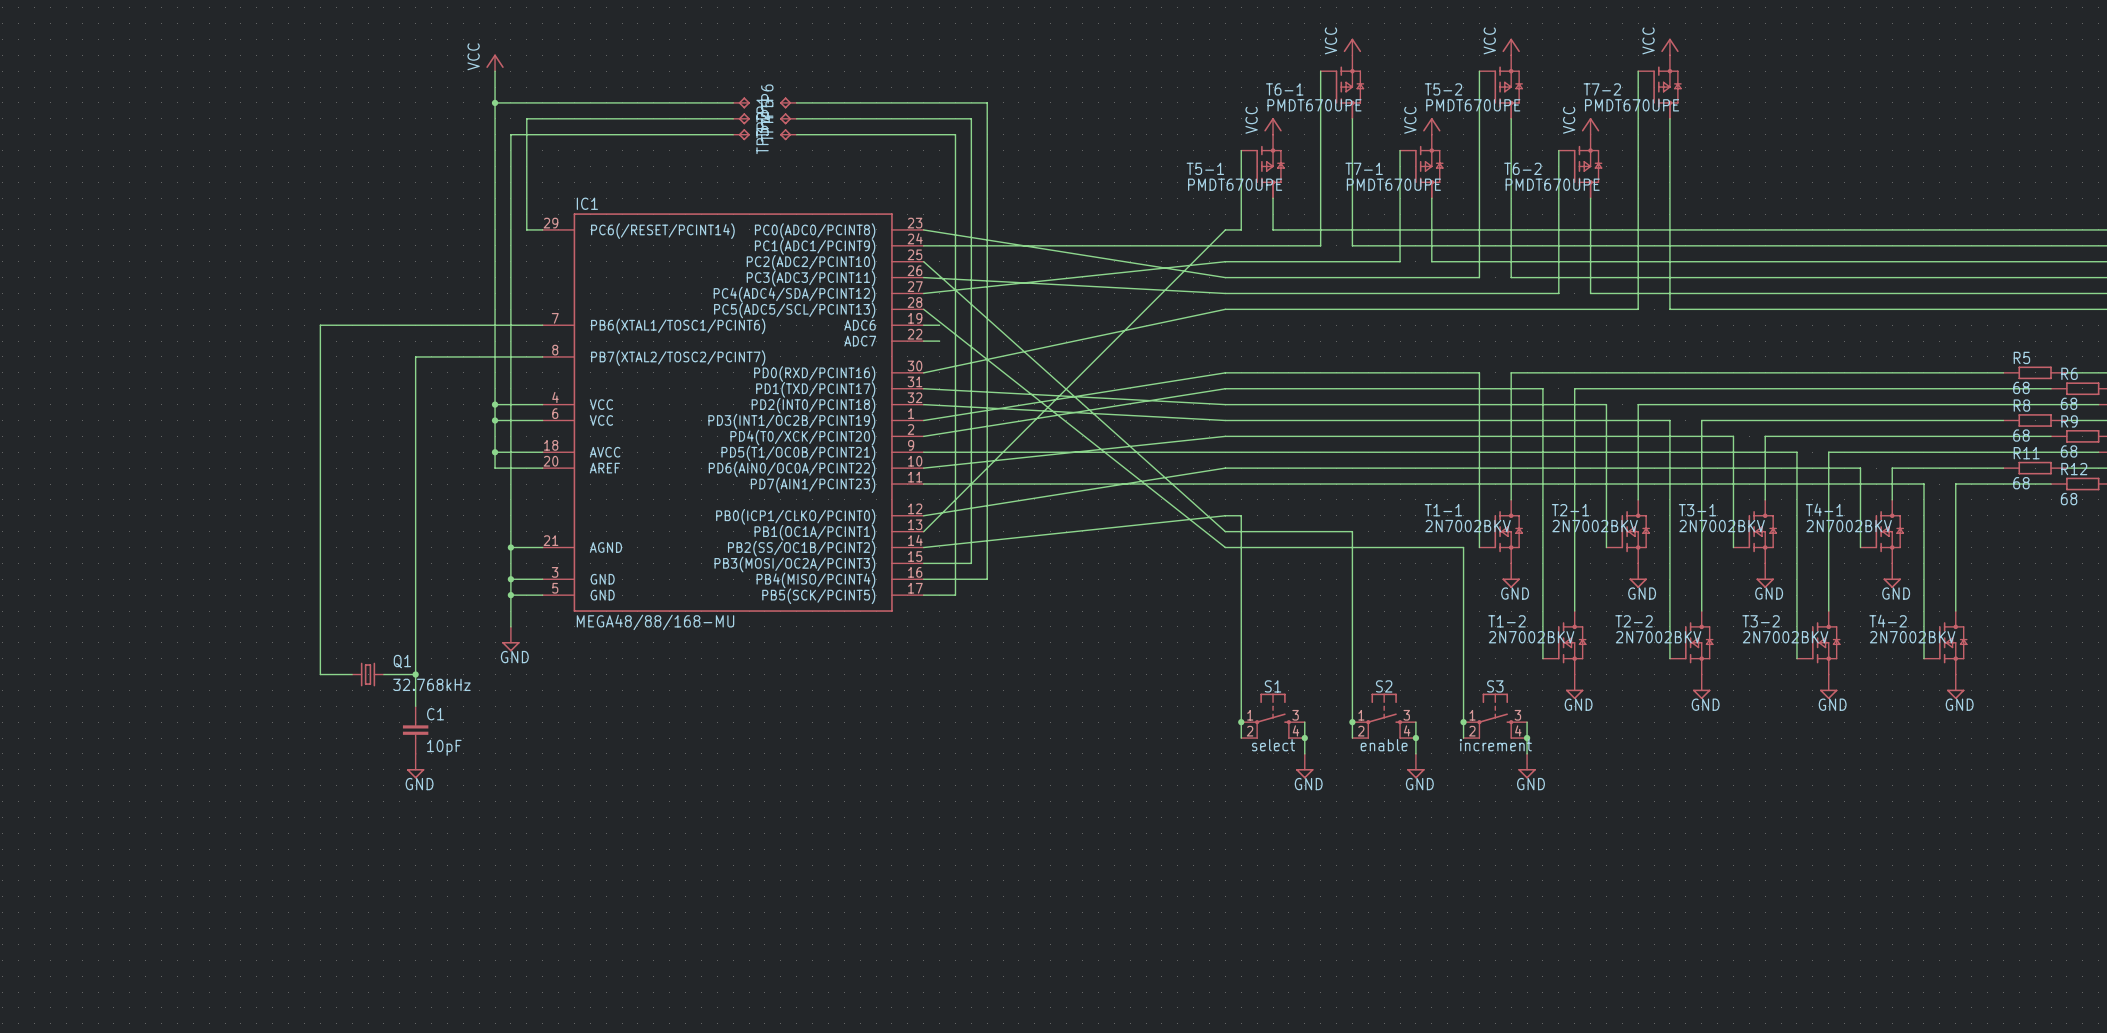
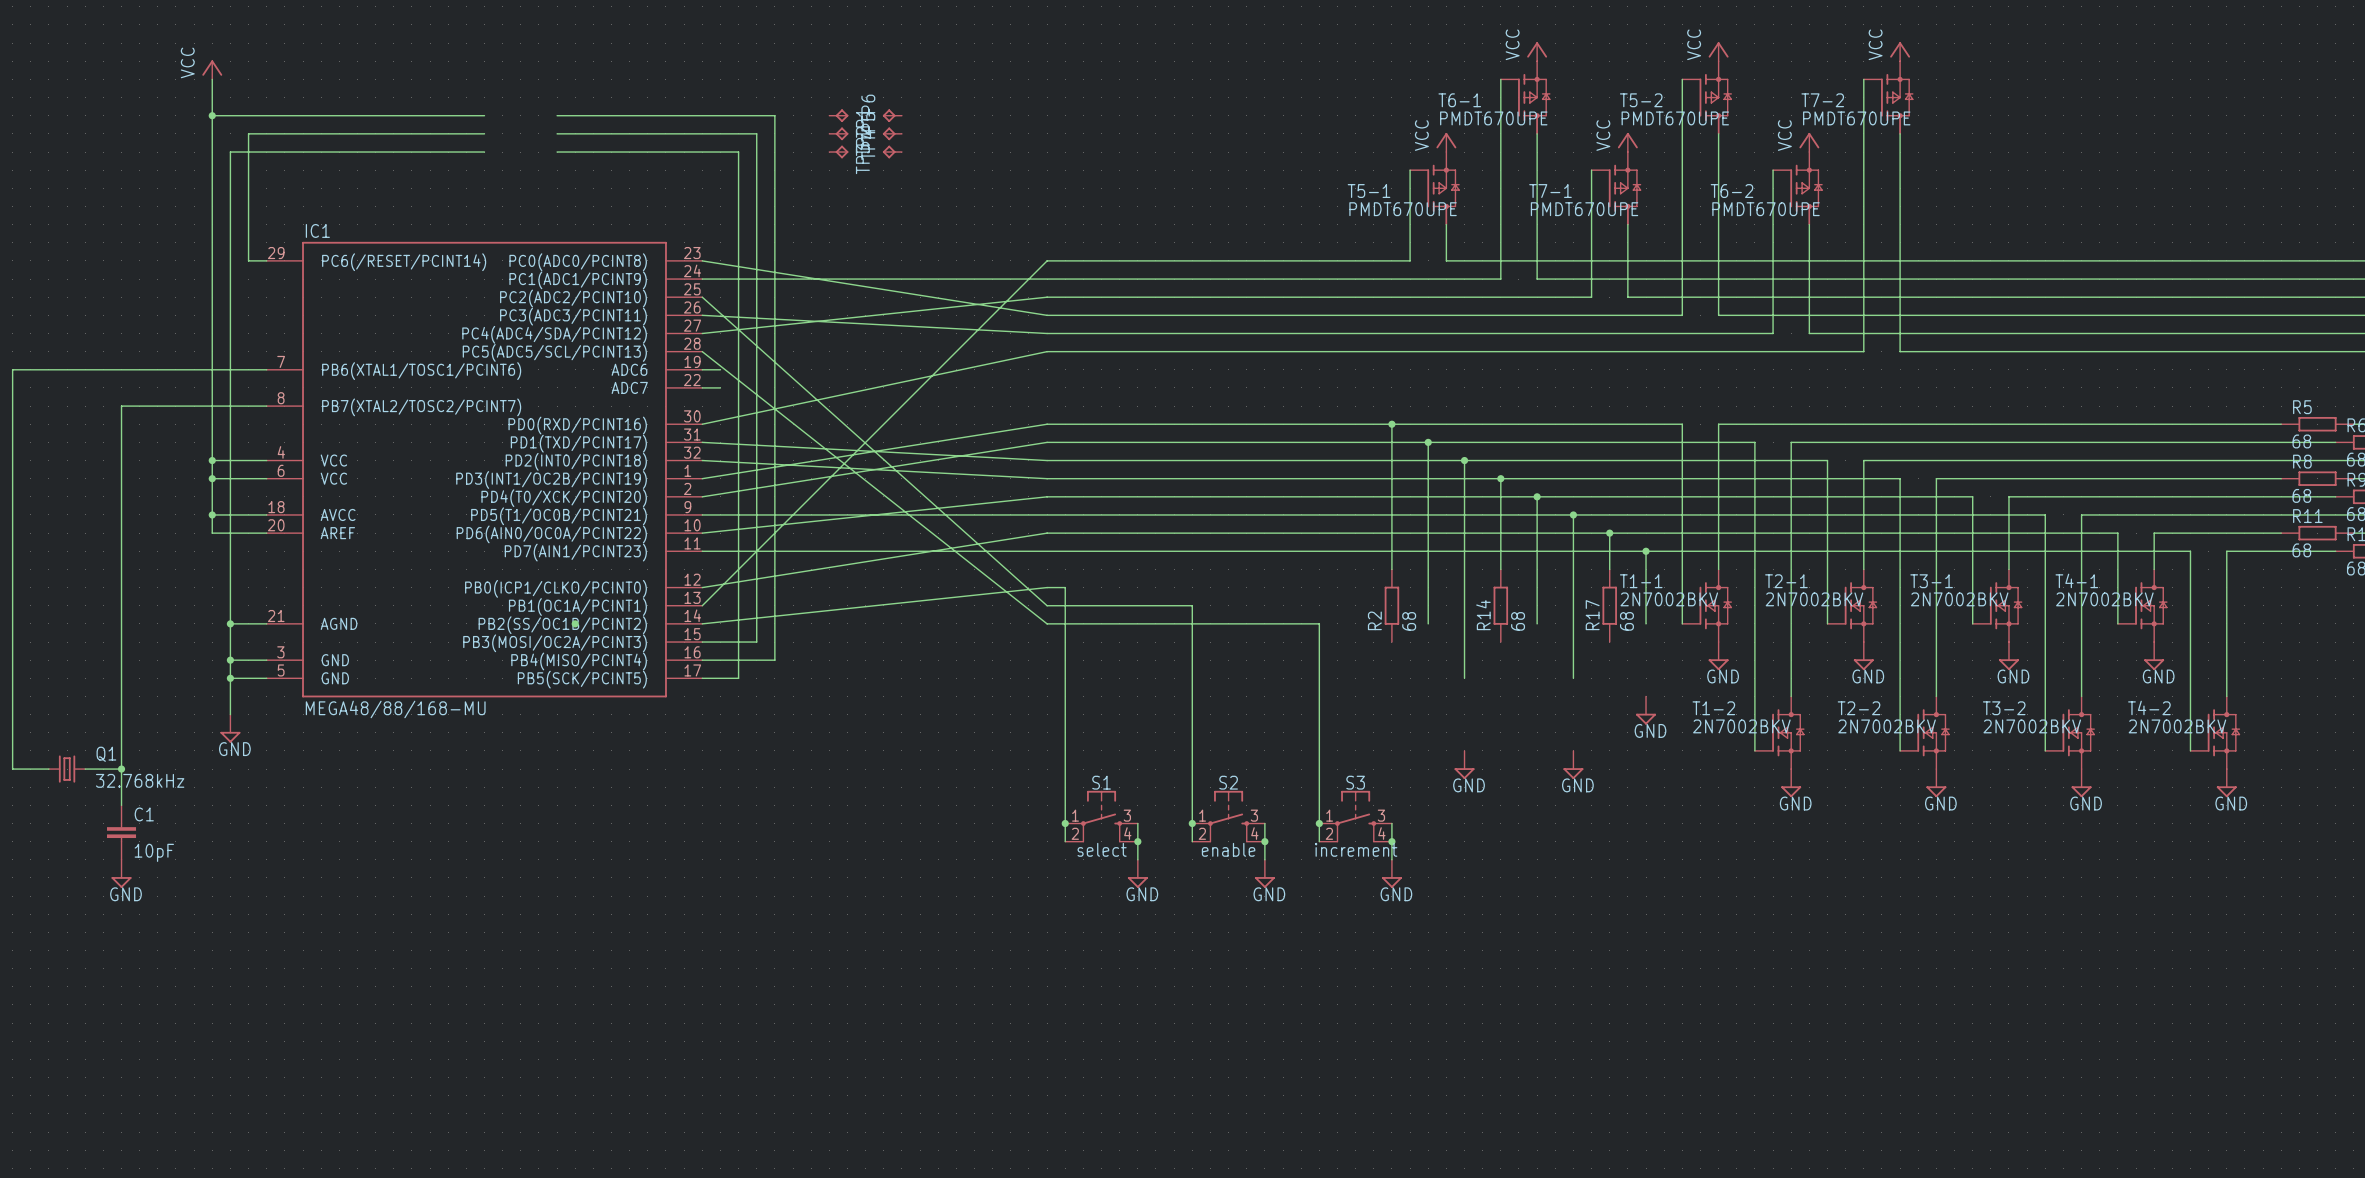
power symbol: none -> VCC (212, 69)
power symbol: VCC (495, 62) -> none
wire: none -> (212, 79) (212, 533) (266, 533)
wire: (495, 71) (495, 468) (542, 468) -> none
wire: none -> (212, 115) (484, 115)
junction: none -> (212, 115)
junction: (495, 102) -> none
wire: (685, 102) (733, 102) -> (774, 115) (774, 660) (702, 660)
wire: (796, 102) (987, 102) (987, 579) (923, 579) -> none
wire: none -> (484, 133) (248, 133) (248, 260) (266, 260)
wire: (526, 118) (526, 229) (542, 229) -> (593, 133) (557, 133)
wire: (669, 118) (733, 118) -> (756, 133) (756, 642) (702, 642)
wire: (796, 118) (971, 118) (971, 563) (923, 563) -> none
wire: none -> (484, 152) (230, 152) (230, 714)
wire: (510, 134) (510, 626) -> (575, 152) (557, 152)
wire: (653, 134) (733, 134) -> (738, 152) (738, 678) (702, 678)
wire: (796, 134) (955, 134) (955, 595) (923, 595) -> none
wire: (923, 229) (1225, 277) -> (702, 260) (1047, 315) (1391, 315)
wire: (1225, 229) (923, 531) -> (1391, 260) (1047, 260) (702, 605)
wire: none -> (702, 279) (1047, 279)
wire: none -> (702, 297) (1047, 605) (1192, 605) (1192, 841)
wire: (923, 261) (1225, 531) (1352, 531) -> (1537, 496) (1537, 605)
wire: (1225, 261) (923, 293) -> (1391, 297) (1047, 297) (702, 333)
wire: (923, 277) (1225, 293) -> (702, 315) (1047, 333) (1391, 333)
wire: none -> (702, 351) (1047, 623) (1319, 623) (1319, 841)
wire: (923, 309) (1225, 547) (1463, 547) (1463, 738) -> none
wire: (1225, 309) (923, 372) -> (1391, 351) (1047, 351) (702, 424)
wire: none -> (266, 369) (12, 369) (12, 769) (48, 769)
wire: (542, 325) (320, 325) (320, 674) (352, 674) -> none
wire: none -> (702, 369) (720, 369)
wire: (923, 325) (939, 325) -> none
wire: none -> (702, 387) (720, 387)
wire: (923, 341) (939, 341) -> none
wire: none -> (266, 406) (121, 406) (121, 805)
wire: (542, 356) (415, 356) (415, 706) -> none
wire: (1225, 372) (923, 420) -> none
junction: none -> (1391, 424)
wire: (923, 388) (1225, 404) -> (702, 442) (1047, 460) (1391, 460)
wire: (1225, 388) (923, 436) -> (1391, 442) (1047, 442) (702, 496)
wire: none -> (1428, 442) (1428, 623)
junction: none -> (1428, 442)
wire: none -> (212, 460) (266, 460)
junction: none -> (212, 460)
wire: (495, 404) (542, 404) -> none
junction: (495, 404) -> none
wire: (923, 404) (1225, 420) -> (702, 460) (1047, 478) (1391, 478)
wire: none -> (1464, 460) (1464, 678)
junction: none -> (1464, 460)
IC1 position: (733, 412) -> (484, 469)
wire: none -> (212, 478) (266, 478)
junction: none -> (212, 478)
wire: (495, 420) (542, 420) -> none
junction: (495, 420) -> none
wire: none -> (702, 478) (1047, 424) (1391, 424) (1391, 569)
wire: none -> (1500, 478) (1500, 569)
junction: none -> (1500, 478)
wire: (1225, 436) (923, 468) -> (1391, 496) (1047, 496) (702, 533)
junction: none -> (1537, 496)
wire: none -> (212, 514) (266, 514)
junction: none -> (212, 514)
wire: (495, 452) (542, 452) -> none
junction: (495, 452) -> none
wire: none -> (702, 514) (1047, 514)
wire: none -> (1573, 514) (1573, 678)
junction: none -> (1573, 514)
wire: (1225, 468) (923, 515) -> (1391, 533) (1047, 533) (702, 587)
wire: none -> (1609, 533) (1609, 569)
junction: none -> (1609, 533)
wire: none -> (702, 551) (1047, 551)
wire: none -> (1646, 551) (1646, 623)
junction: none -> (1646, 551)
R2: none -> 68 (1391, 605)
R14: none -> 68 (1500, 605)
R17: none -> 68 (1609, 605)
wire: none -> (230, 623) (266, 623)
junction: none -> (230, 623)
wire: (510, 547) (542, 547) -> none
wire: none -> (702, 623) (1047, 587) (1065, 587) (1065, 841)
wire: (923, 547) (1225, 515) (1241, 515) (1241, 738) -> none
wire: (1352, 547) (1352, 738) -> none
wire: none -> (230, 660) (266, 660)
junction: none -> (230, 660)
wire: (510, 579) (542, 579) -> none
junction: (510, 579) -> none
wire: none -> (230, 678) (266, 678)
junction: none -> (230, 678)
wire: (510, 595) (542, 595) -> none
junction: (510, 595) -> none
power symbol: none -> GND (1646, 710)
power symbol: none -> GND (230, 728)
power symbol: GND (510, 639) -> none
power symbol: none -> GND (1464, 764)
power symbol: none -> GND (1573, 764)
wire: none -> (85, 769) (121, 769)
junction: none -> (121, 769)
Q1 position: (368, 674) -> (67, 769)
wire: (383, 674) (415, 674) -> none
junction: (415, 674) -> none
S1 position: (1273, 716) -> (1101, 816)
S2 position: (1384, 716) -> (1228, 816)
S3 position: (1495, 716) -> (1355, 816)
junction: none -> (1065, 823)
wire: none -> (1137, 823) (1137, 859)
junction: none -> (1192, 823)
wire: none -> (1264, 823) (1264, 859)
junction: none -> (1319, 823)
junction position: (1241, 722) -> (1391, 841)
wire: (1304, 722) (1304, 753) -> (1391, 823) (1391, 859)
junction: (1352, 722) -> none
wire: (1415, 722) (1415, 753) -> none
junction: (1463, 722) -> none
wire: (1527, 722) (1527, 753) -> none
C1 position: (415, 730) -> (121, 832)
junction: none -> (1137, 841)
junction: none -> (1264, 841)
junction: (1304, 738) -> none
junction: (1415, 738) -> none
junction: (1527, 738) -> none
power symbol: none -> GND (121, 873)
power symbol: GND (415, 766) -> none
power symbol: none -> GND (1137, 873)
power symbol: none -> GND (1264, 873)
power symbol: none -> GND (1391, 873)
power symbol: GND (1304, 766) -> none
power symbol: GND (1415, 766) -> none
power symbol: GND (1527, 766) -> none

